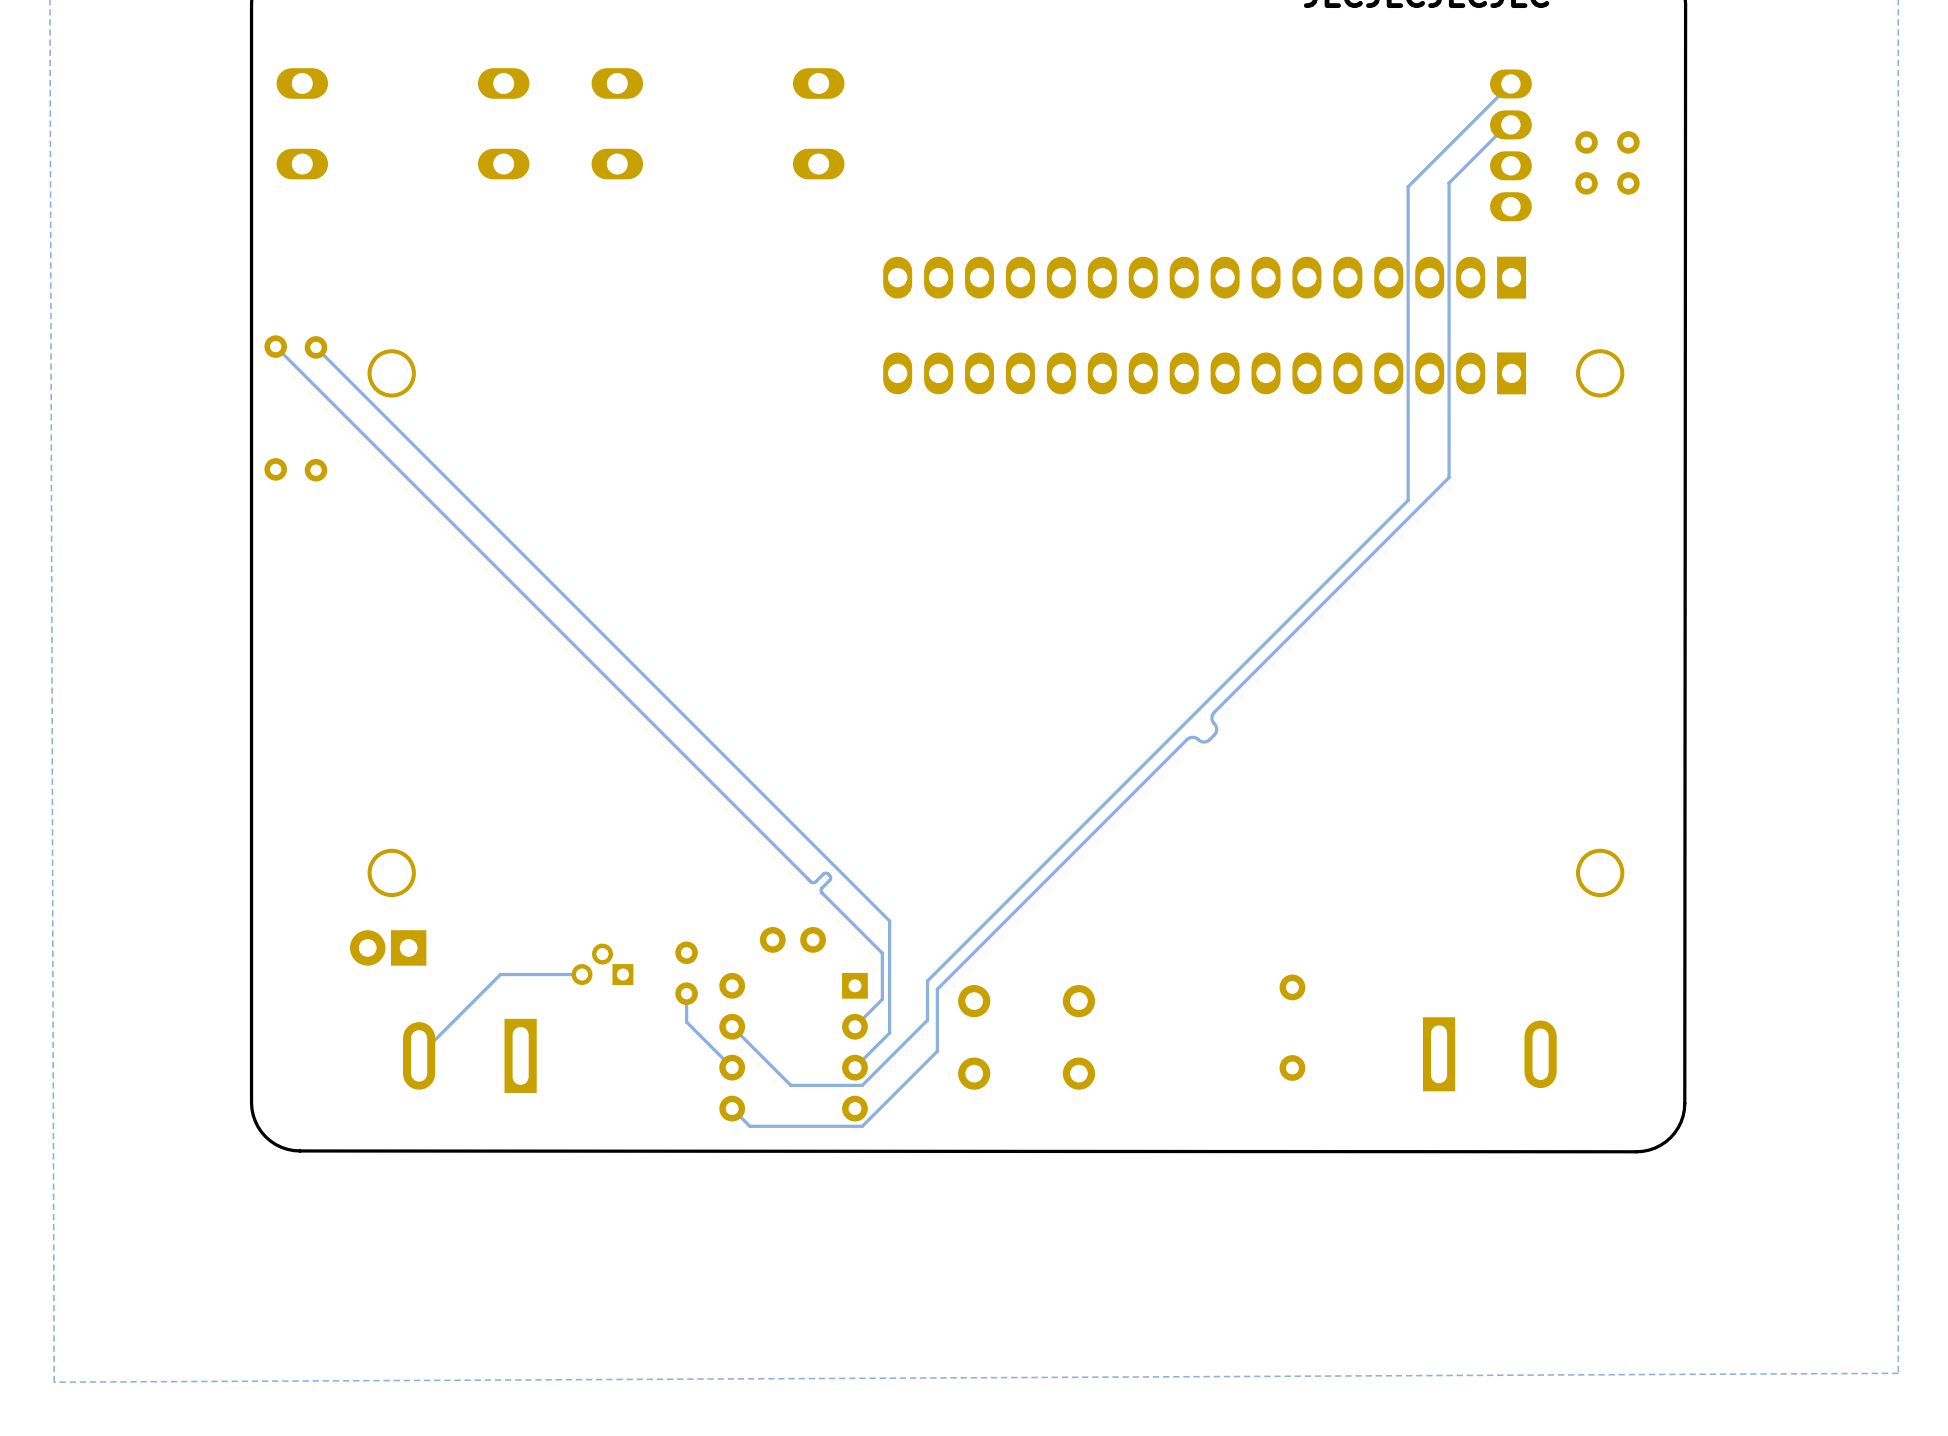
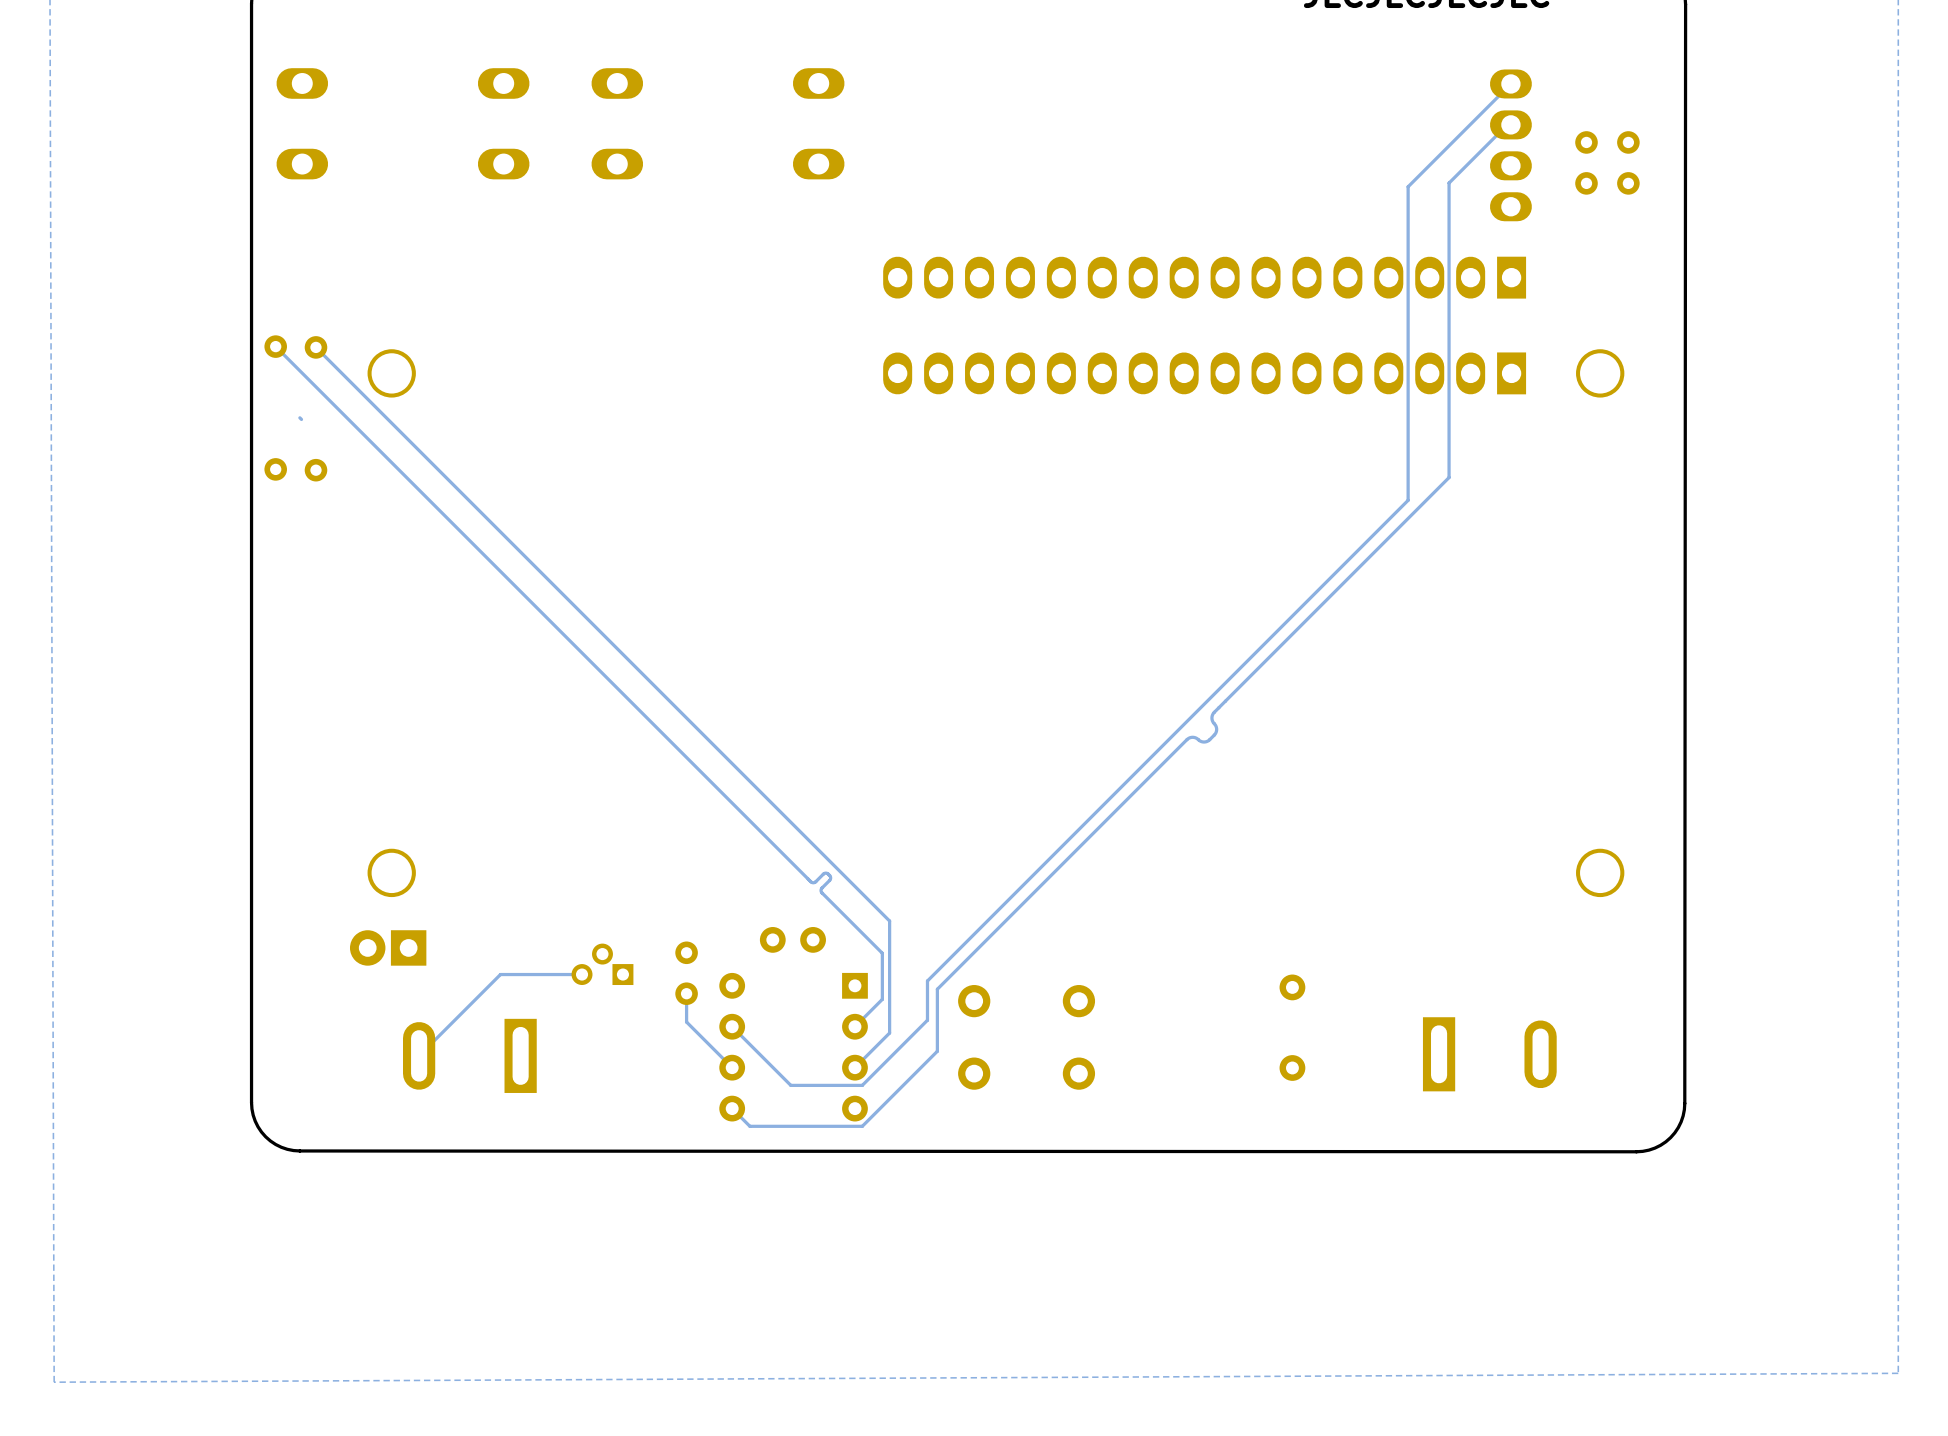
track: none -> (299, 417) (301, 419)

